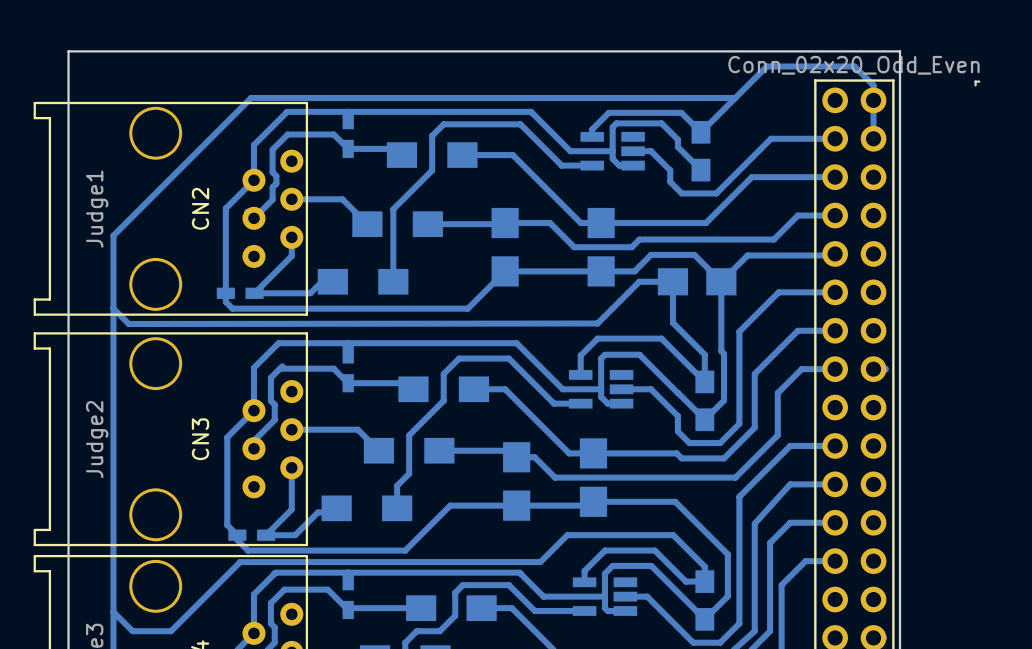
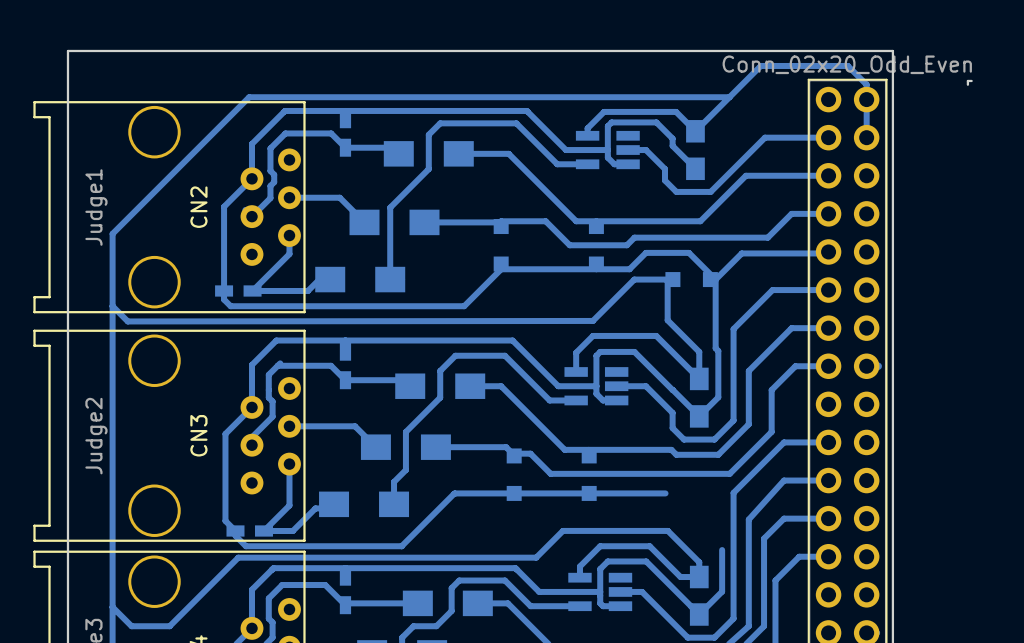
part footprint: [491, 207, 519, 287] -> [493, 219, 509, 272]
part footprint: [587, 207, 615, 287] -> [588, 219, 604, 272]
part footprint: [657, 268, 737, 296] -> [665, 272, 718, 288]
part footprint: [579, 438, 608, 517] -> [581, 448, 597, 501]
part footprint: [503, 442, 531, 521] -> [506, 448, 522, 501]
bottom track: (405, 550) (450, 505) (589, 505) (593, 501) (675, 501) (727, 554) -> (401, 546) (454, 493) (665, 493)

